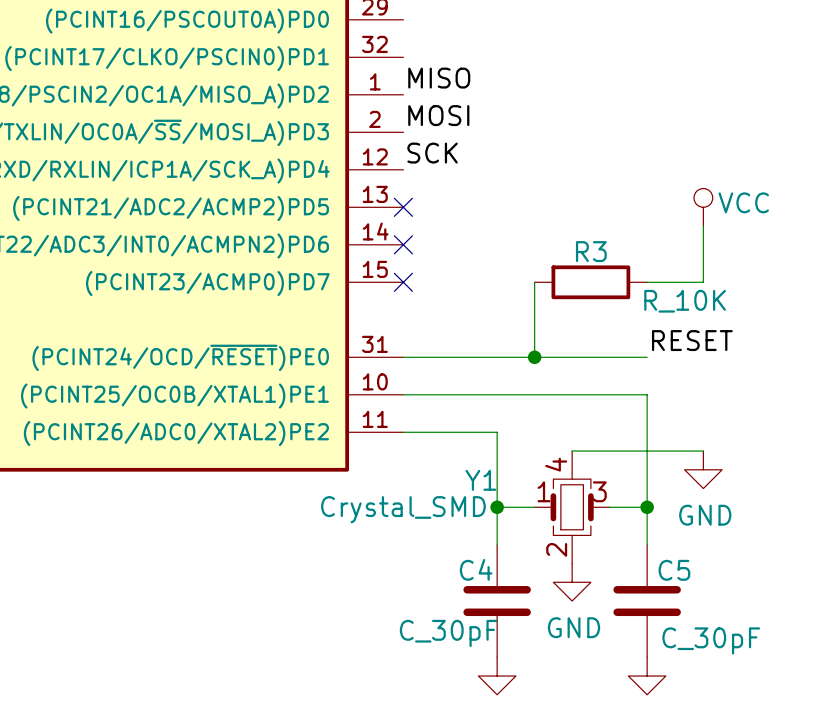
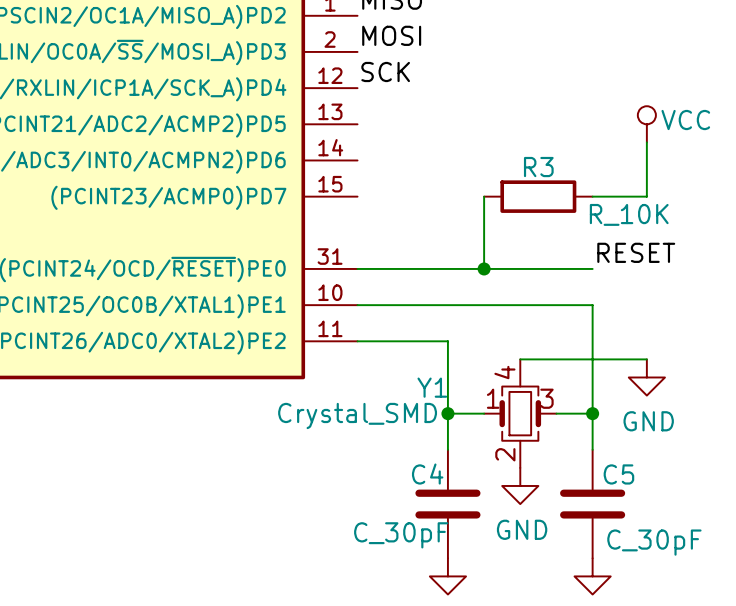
no-connect mark: (403, 207) -> none
no-connect mark: (403, 244) -> none
no-connect mark: (403, 282) -> none

